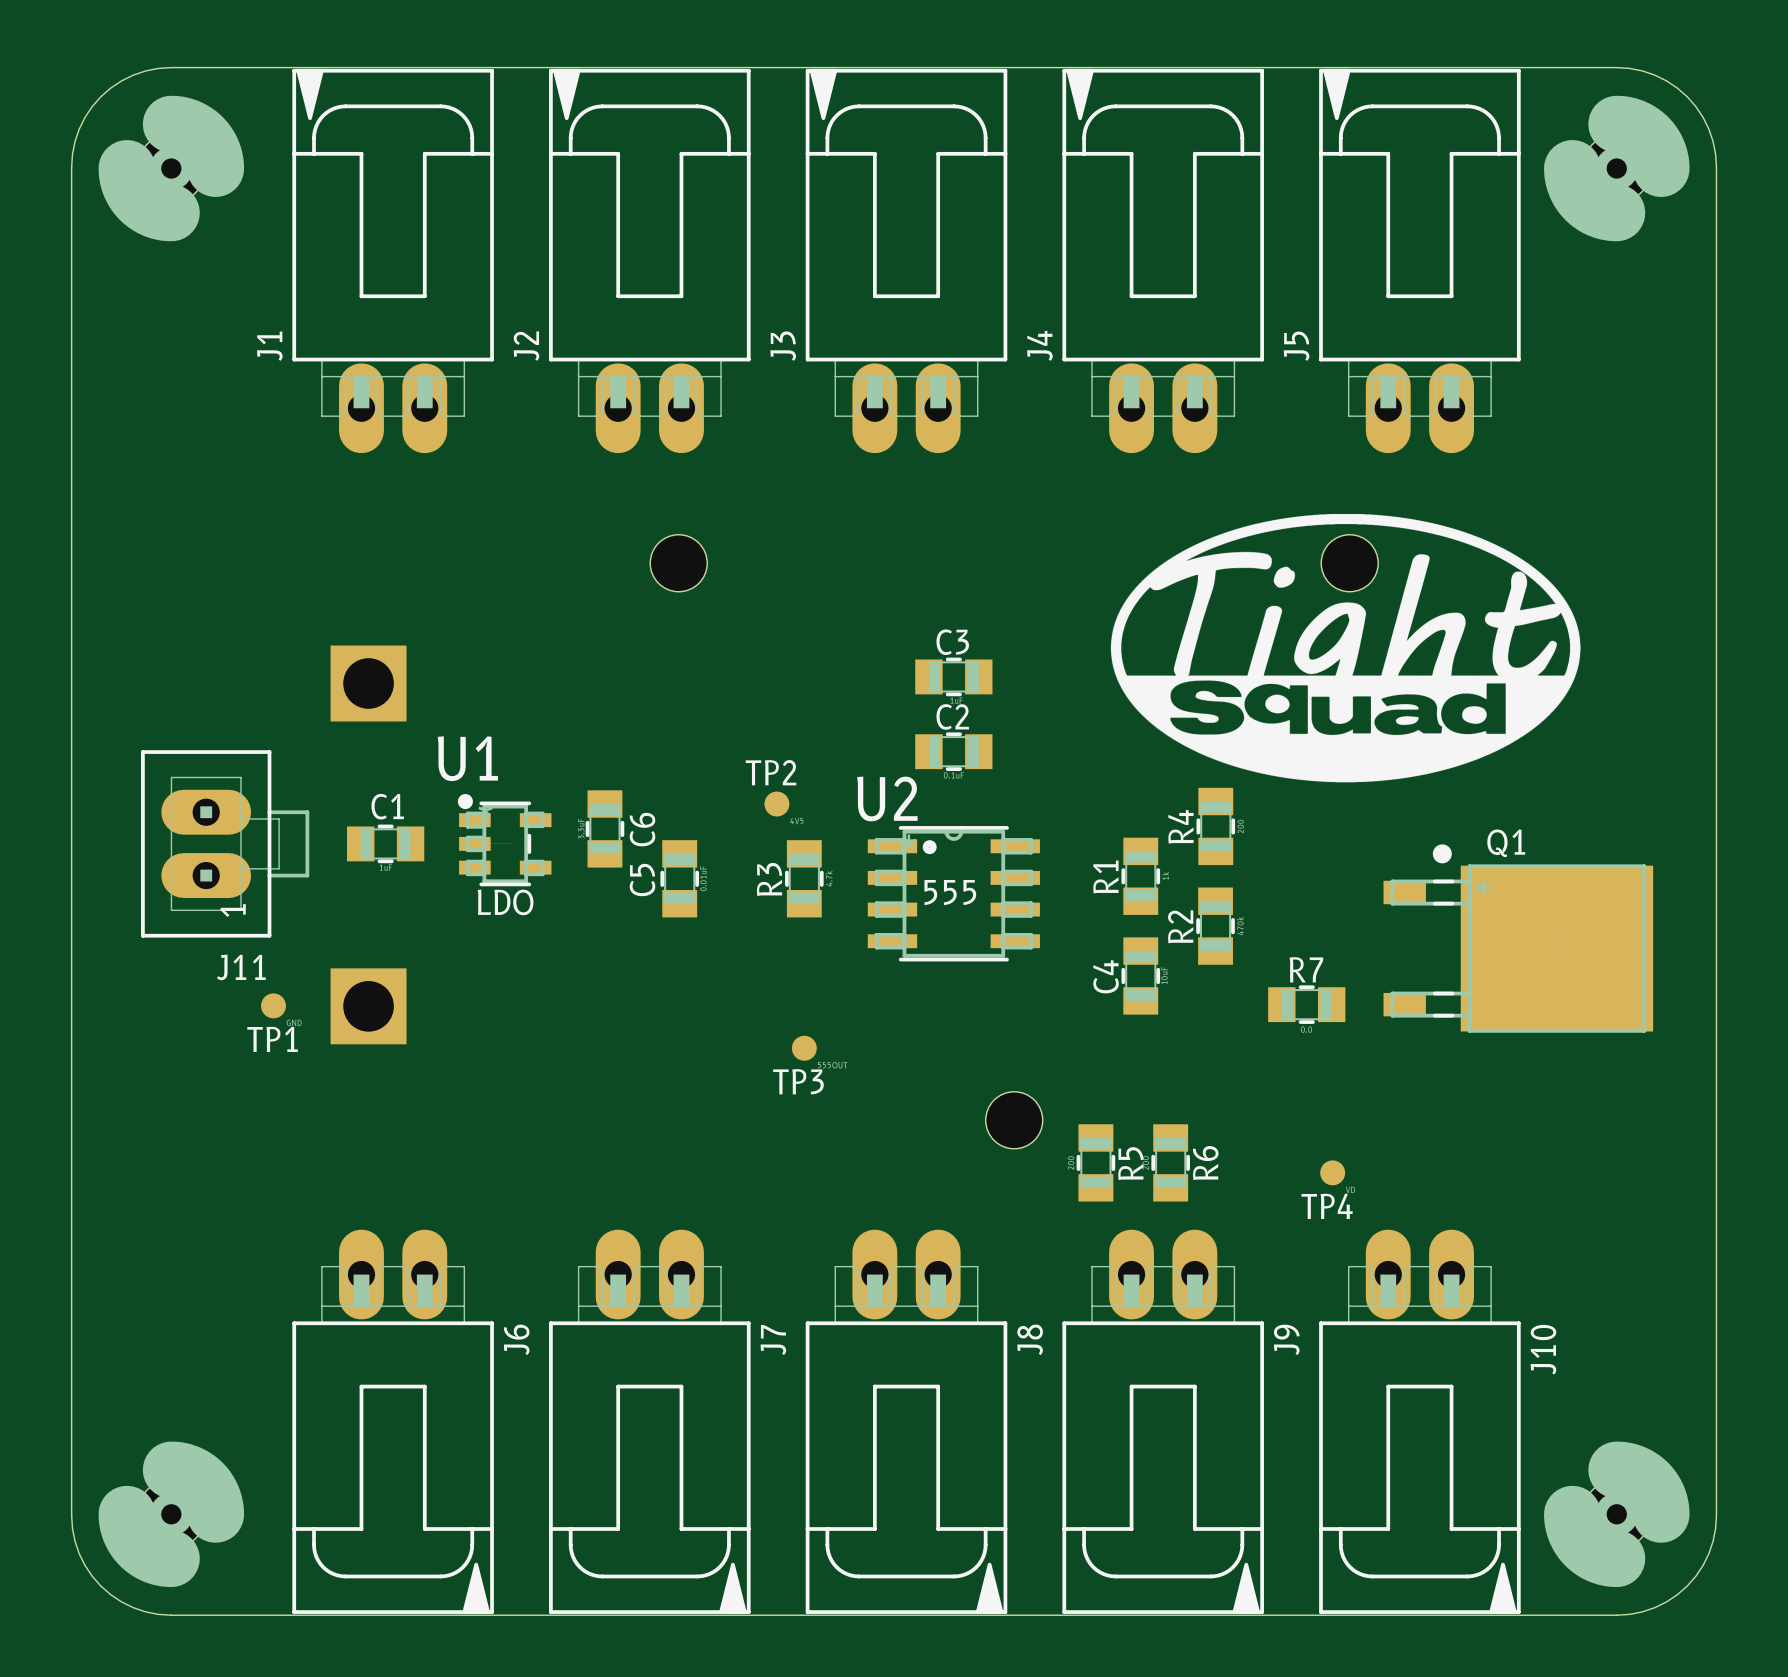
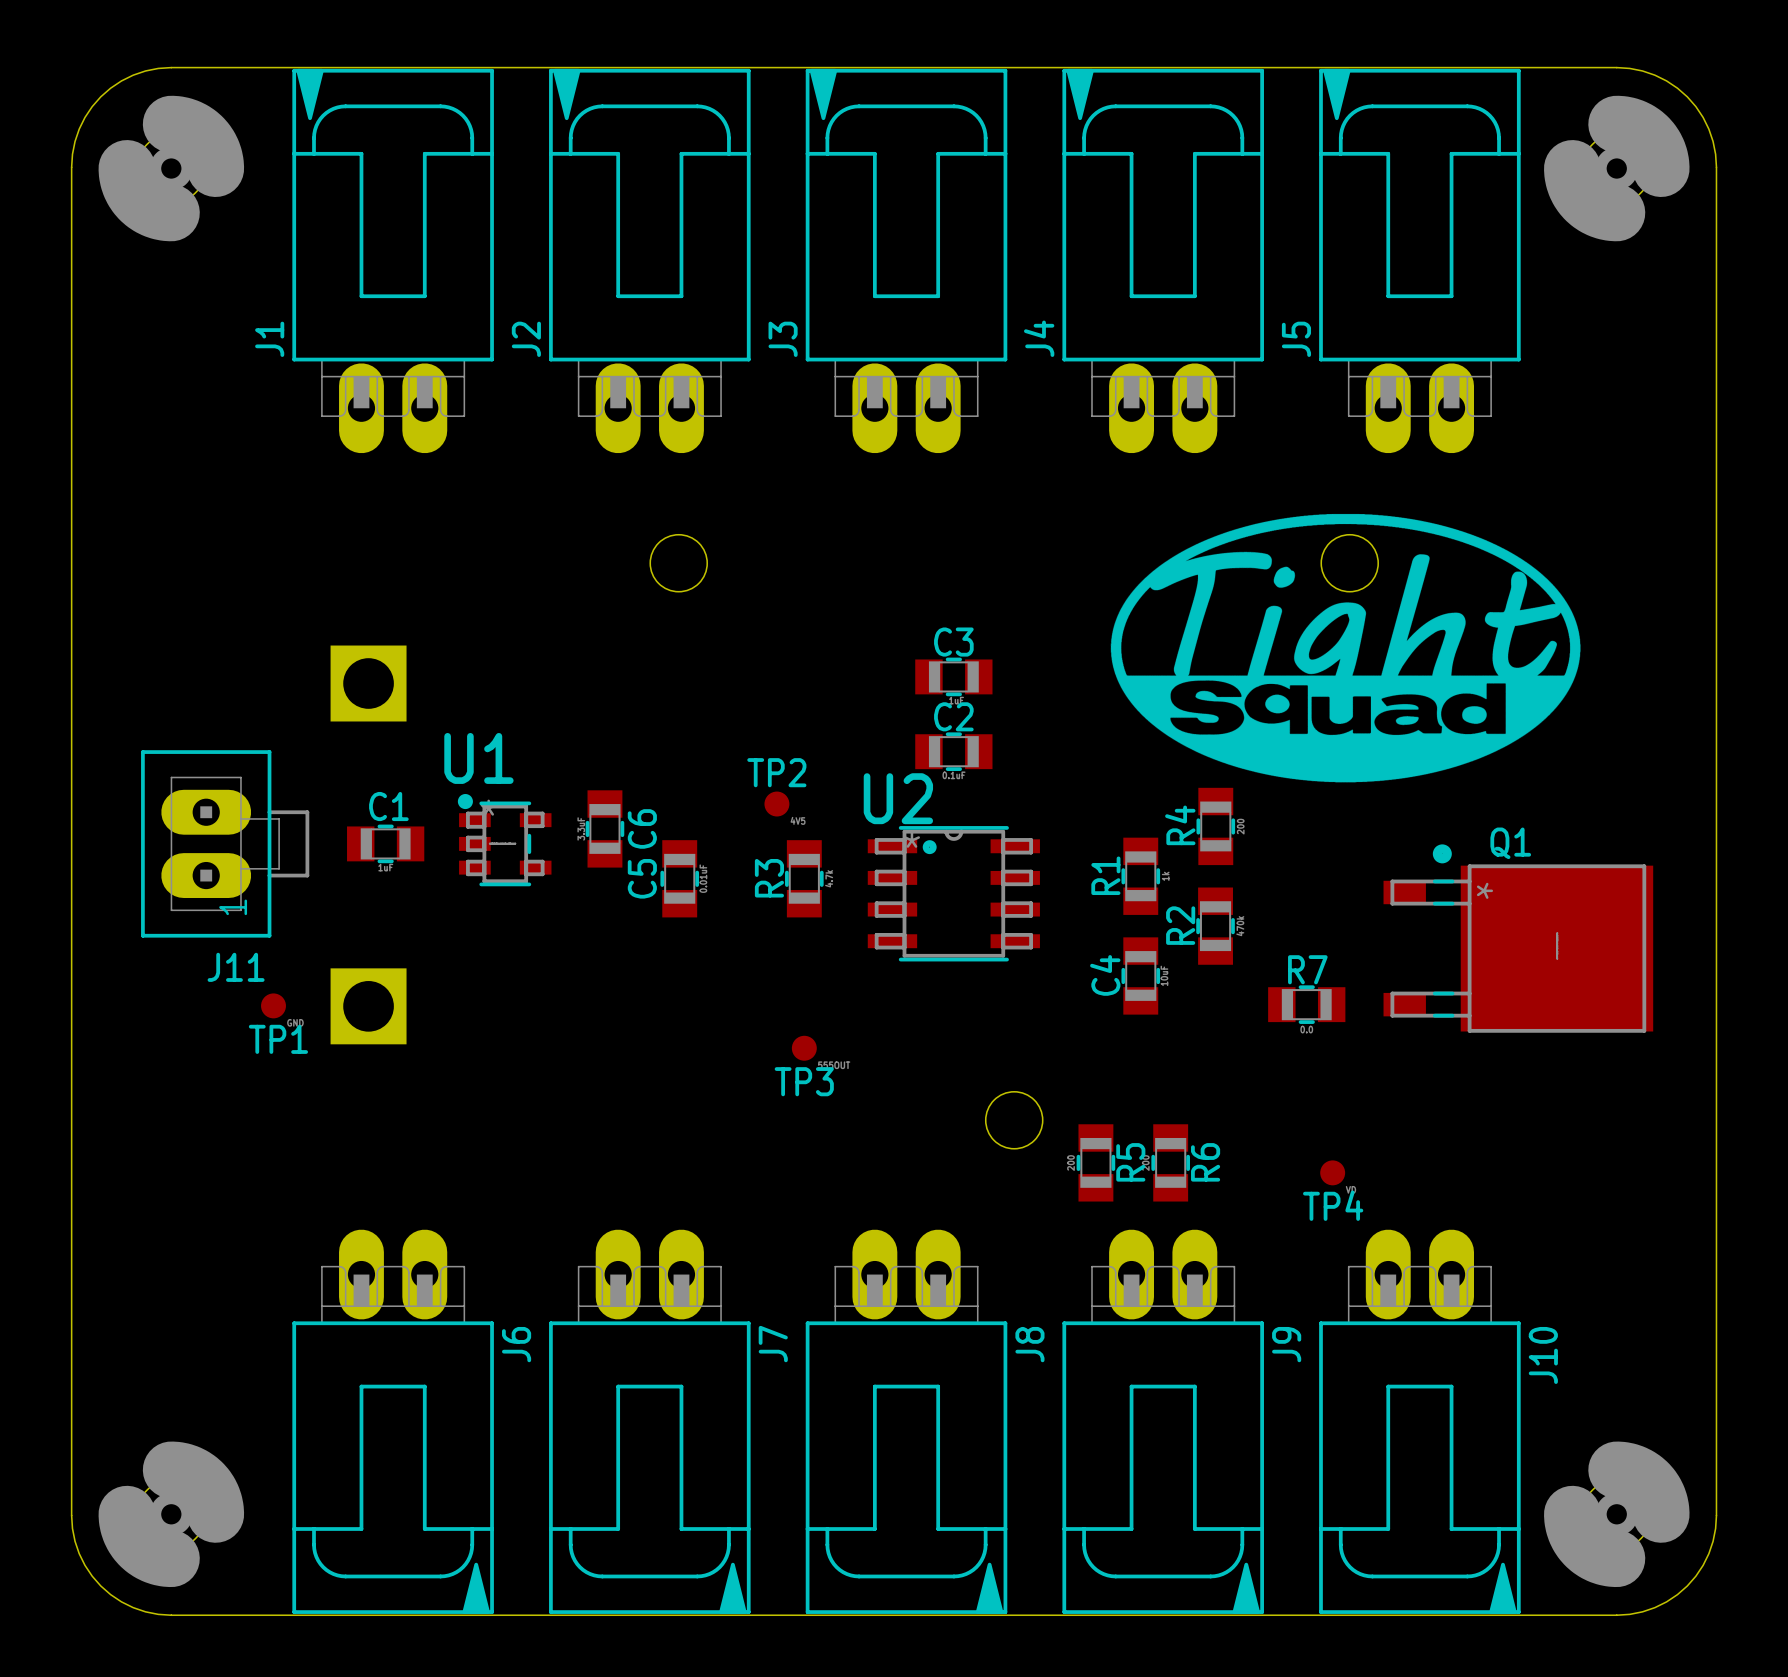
text: 555 (950, 892) -> none
text: LDO (505, 902) -> none

